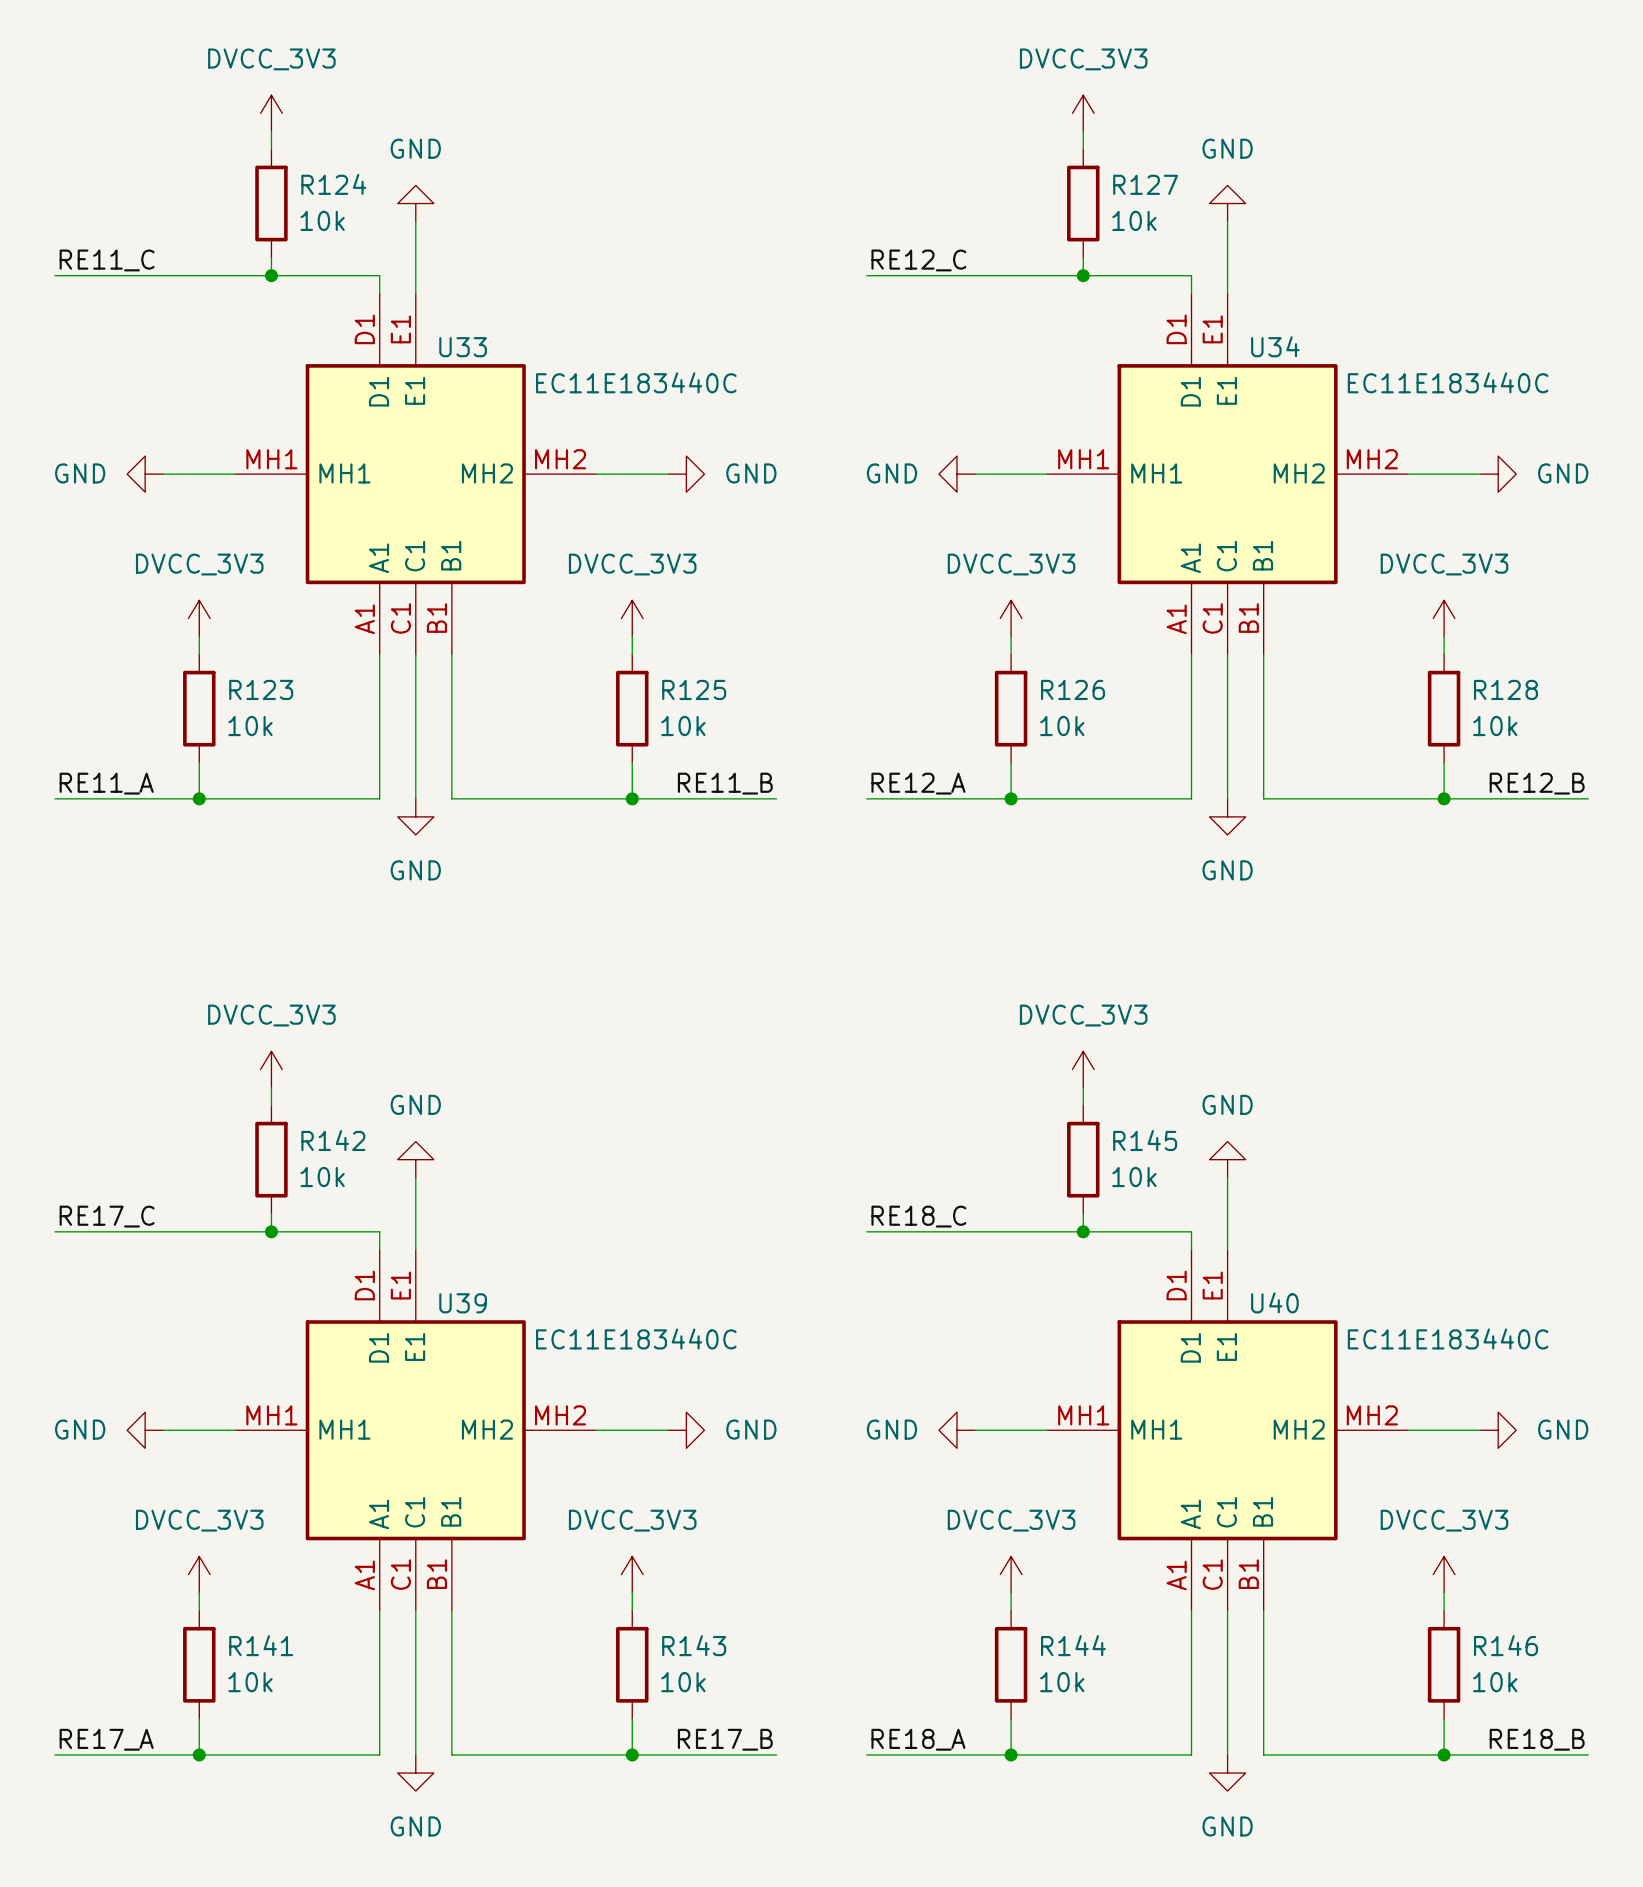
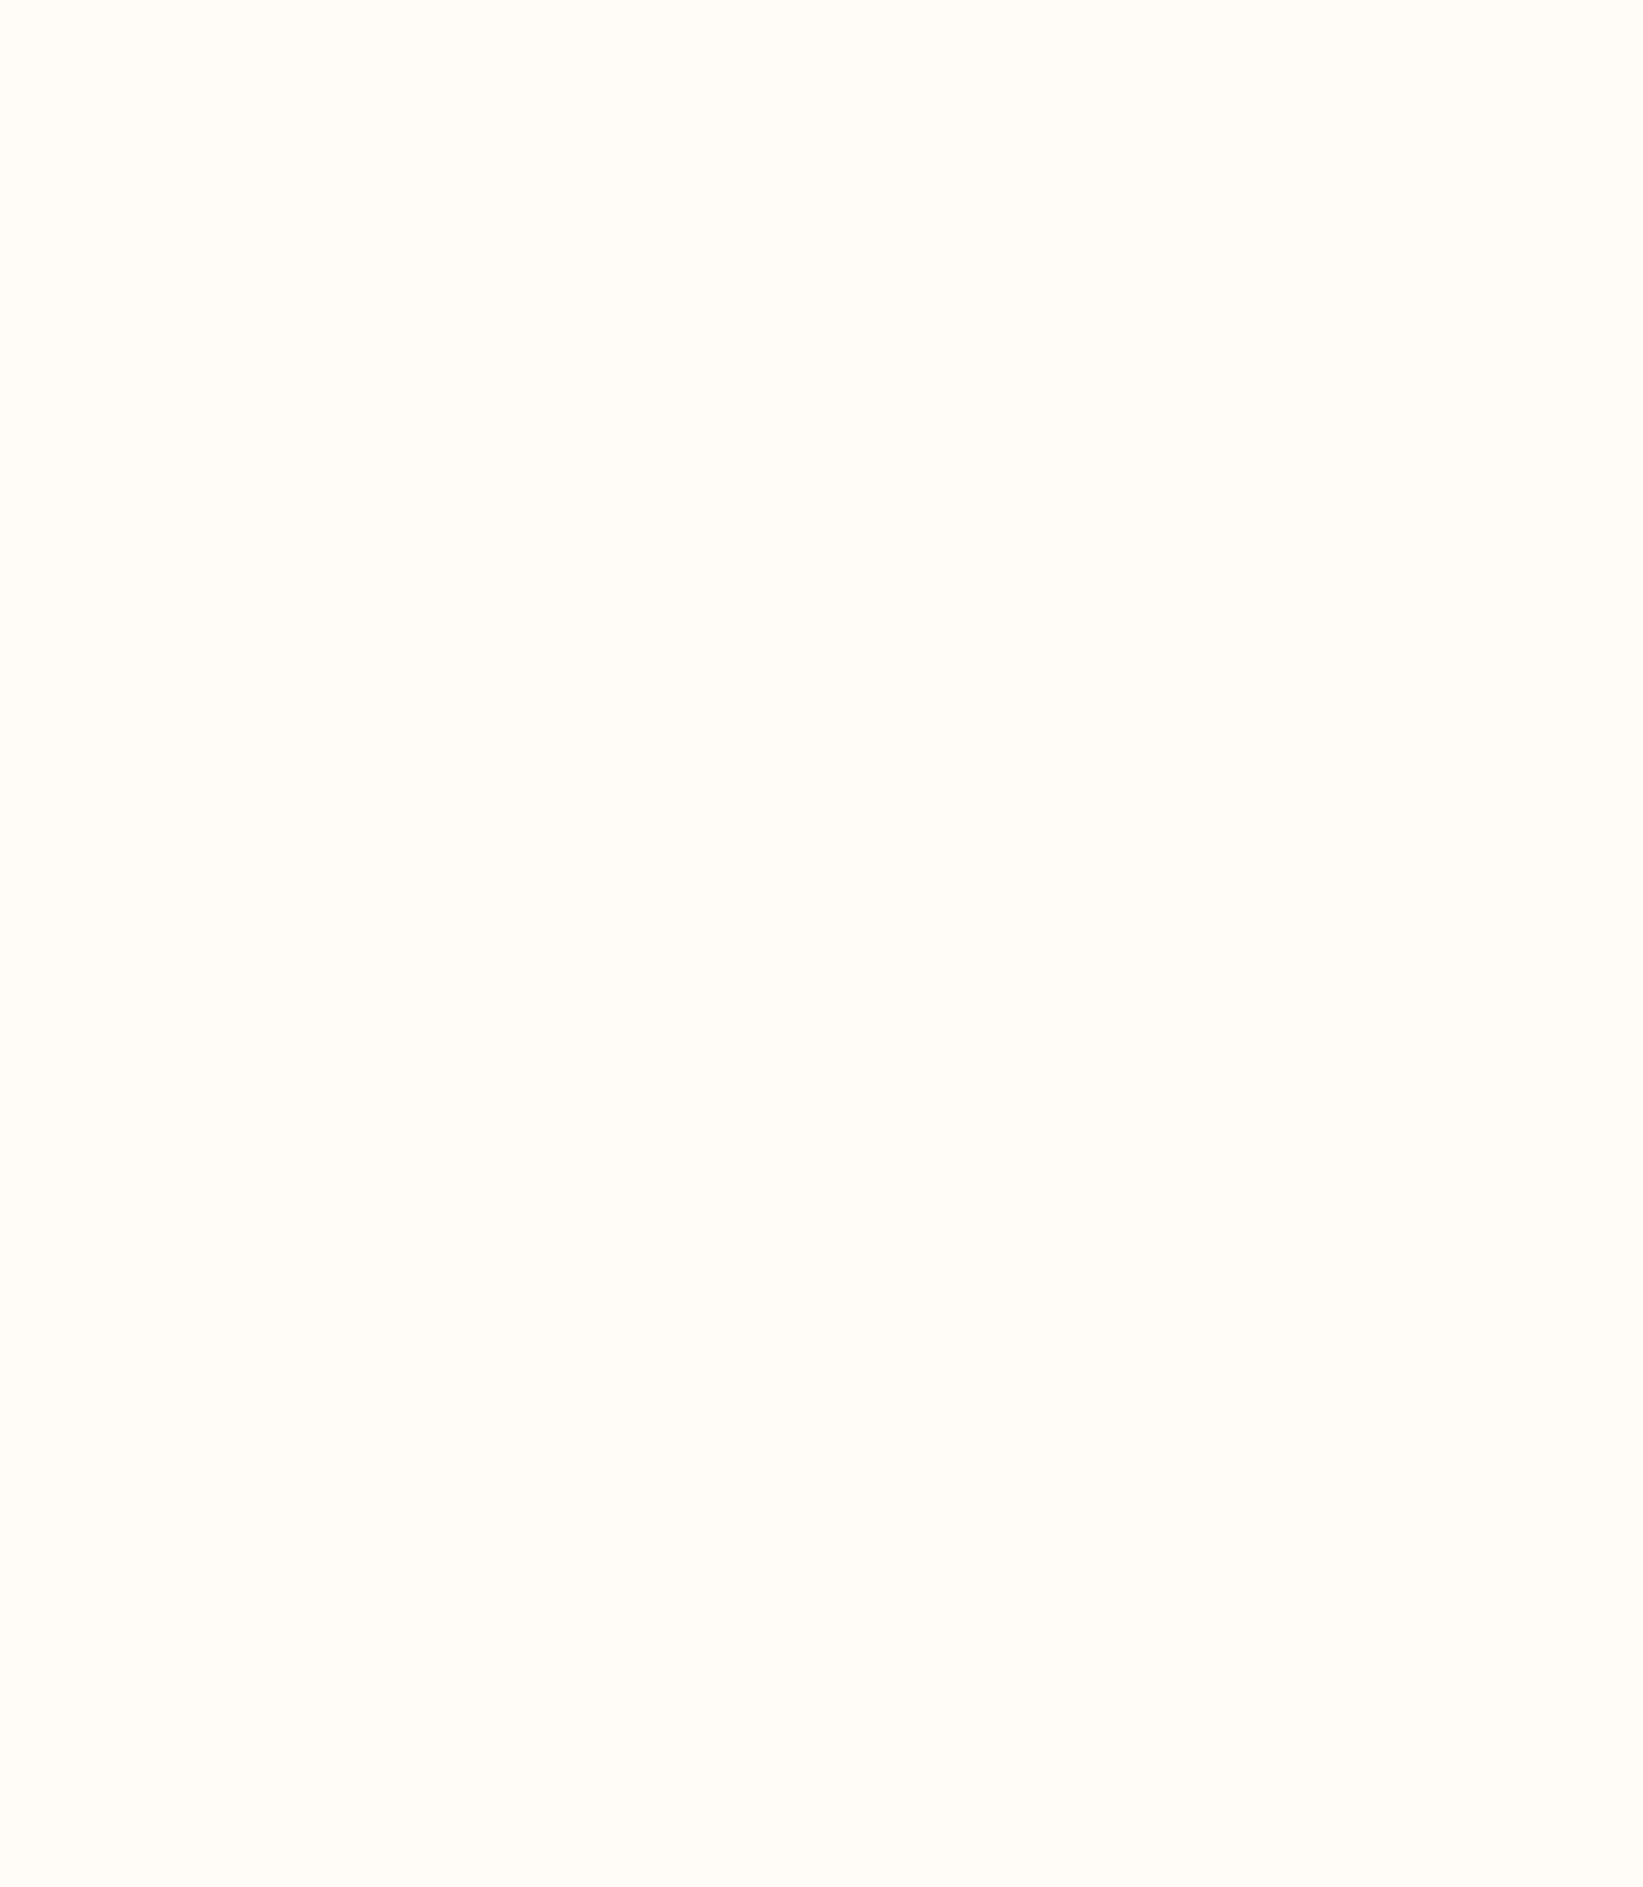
power symbol: DVCC_3V3 (271, 113) -> none
power symbol: DVCC_3V3 (1083, 113) -> none
wire: (271, 131) (271, 149) -> none
wire: (1083, 131) (1083, 149) -> none
R124: 10k (271, 203) -> none
power symbol: GND (415, 203) -> none
R127: 10k (1083, 203) -> none
power symbol: GND (1227, 203) -> none
wire: (415, 221) (415, 293) -> none
wire: (1227, 221) (1227, 293) -> none
wire: (271, 257) (271, 275) -> none
wire: (1083, 257) (1083, 275) -> none
label: RE11_C (107, 260) -> none
label: RE12_C (918, 260) -> none
wire: (54, 275) (379, 275) (379, 293) -> none
junction: (271, 275) -> none
wire: (866, 275) (1191, 275) (1191, 293) -> none
junction: (1083, 275) -> none
power symbol: GND (145, 474) -> none
wire: (163, 474) (235, 474) -> none
U33: EC11E183440C (415, 474) -> none
wire: (596, 474) (668, 474) -> none
power symbol: GND (686, 474) -> none
power symbol: GND (956, 474) -> none
wire: (975, 474) (1047, 474) -> none
U34: EC11E183440C (1227, 474) -> none
wire: (1407, 474) (1480, 474) -> none
power symbol: GND (1498, 474) -> none
power symbol: DVCC_3V3 (199, 618) -> none
power symbol: DVCC_3V3 (632, 618) -> none
power symbol: DVCC_3V3 (1011, 618) -> none
power symbol: DVCC_3V3 (1444, 618) -> none
wire: (199, 636) (199, 654) -> none
wire: (632, 636) (632, 654) -> none
wire: (1011, 636) (1011, 654) -> none
wire: (1444, 636) (1444, 654) -> none
wire: (379, 654) (379, 798) (54, 798) -> none
wire: (415, 654) (415, 798) -> none
wire: (451, 654) (451, 798) (776, 798) -> none
wire: (1191, 654) (1191, 798) (866, 798) -> none
wire: (1227, 654) (1227, 798) -> none
wire: (1263, 654) (1263, 798) (1588, 798) -> none
R123: 10k (199, 708) -> none
R125: 10k (632, 708) -> none
R126: 10k (1011, 708) -> none
R128: 10k (1444, 708) -> none
wire: (199, 762) (199, 798) -> none
wire: (632, 762) (632, 798) -> none
wire: (1011, 762) (1011, 798) -> none
wire: (1444, 762) (1444, 798) -> none
label: RE11_A (106, 783) -> none
label: RE11_B (725, 783) -> none
label: RE12_A (918, 783) -> none
label: RE12_B (1537, 783) -> none
junction: (199, 798) -> none
junction: (632, 798) -> none
junction: (1011, 798) -> none
junction: (1444, 798) -> none
power symbol: GND (415, 816) -> none
power symbol: GND (1227, 816) -> none
power symbol: DVCC_3V3 (271, 1069) -> none
power symbol: DVCC_3V3 (1083, 1069) -> none
wire: (271, 1087) (271, 1105) -> none
wire: (1083, 1087) (1083, 1105) -> none
R142: 10k (271, 1159) -> none
power symbol: GND (415, 1159) -> none
R145: 10k (1083, 1159) -> none
power symbol: GND (1227, 1159) -> none
wire: (415, 1177) (415, 1249) -> none
wire: (1227, 1177) (1227, 1249) -> none
wire: (271, 1213) (271, 1231) -> none
wire: (1083, 1213) (1083, 1231) -> none
label: RE17_C (107, 1216) -> none
label: RE18_C (918, 1216) -> none
wire: (54, 1231) (379, 1231) (379, 1249) -> none
junction: (271, 1231) -> none
wire: (866, 1231) (1191, 1231) (1191, 1249) -> none
junction: (1083, 1231) -> none
power symbol: GND (145, 1430) -> none
wire: (163, 1430) (235, 1430) -> none
U39: EC11E183440C (415, 1430) -> none
wire: (596, 1430) (668, 1430) -> none
power symbol: GND (686, 1430) -> none
power symbol: GND (956, 1430) -> none
wire: (975, 1430) (1047, 1430) -> none
U40: EC11E183440C (1227, 1430) -> none
wire: (1407, 1430) (1480, 1430) -> none
power symbol: GND (1498, 1430) -> none
power symbol: DVCC_3V3 (199, 1574) -> none
power symbol: DVCC_3V3 (632, 1574) -> none
power symbol: DVCC_3V3 (1011, 1574) -> none
power symbol: DVCC_3V3 (1444, 1574) -> none
wire: (199, 1592) (199, 1610) -> none
wire: (632, 1592) (632, 1610) -> none
wire: (1011, 1592) (1011, 1610) -> none
wire: (1444, 1592) (1444, 1610) -> none
wire: (379, 1610) (379, 1754) (54, 1754) -> none
wire: (415, 1610) (415, 1754) -> none
wire: (451, 1610) (451, 1754) (776, 1754) -> none
wire: (1191, 1610) (1191, 1754) (866, 1754) -> none
wire: (1227, 1610) (1227, 1754) -> none
wire: (1263, 1610) (1263, 1754) (1588, 1754) -> none
R141: 10k (199, 1664) -> none
R143: 10k (632, 1664) -> none
R144: 10k (1011, 1664) -> none
R146: 10k (1444, 1664) -> none
wire: (199, 1718) (199, 1754) -> none
wire: (632, 1718) (632, 1754) -> none
wire: (1011, 1718) (1011, 1754) -> none
wire: (1444, 1718) (1444, 1754) -> none
label: RE17_A (106, 1739) -> none
label: RE17_B (725, 1739) -> none
label: RE18_A (918, 1739) -> none
label: RE18_B (1537, 1739) -> none
junction: (199, 1754) -> none
junction: (632, 1754) -> none
junction: (1011, 1754) -> none
junction: (1444, 1754) -> none
power symbol: GND (415, 1773) -> none
power symbol: GND (1227, 1773) -> none

